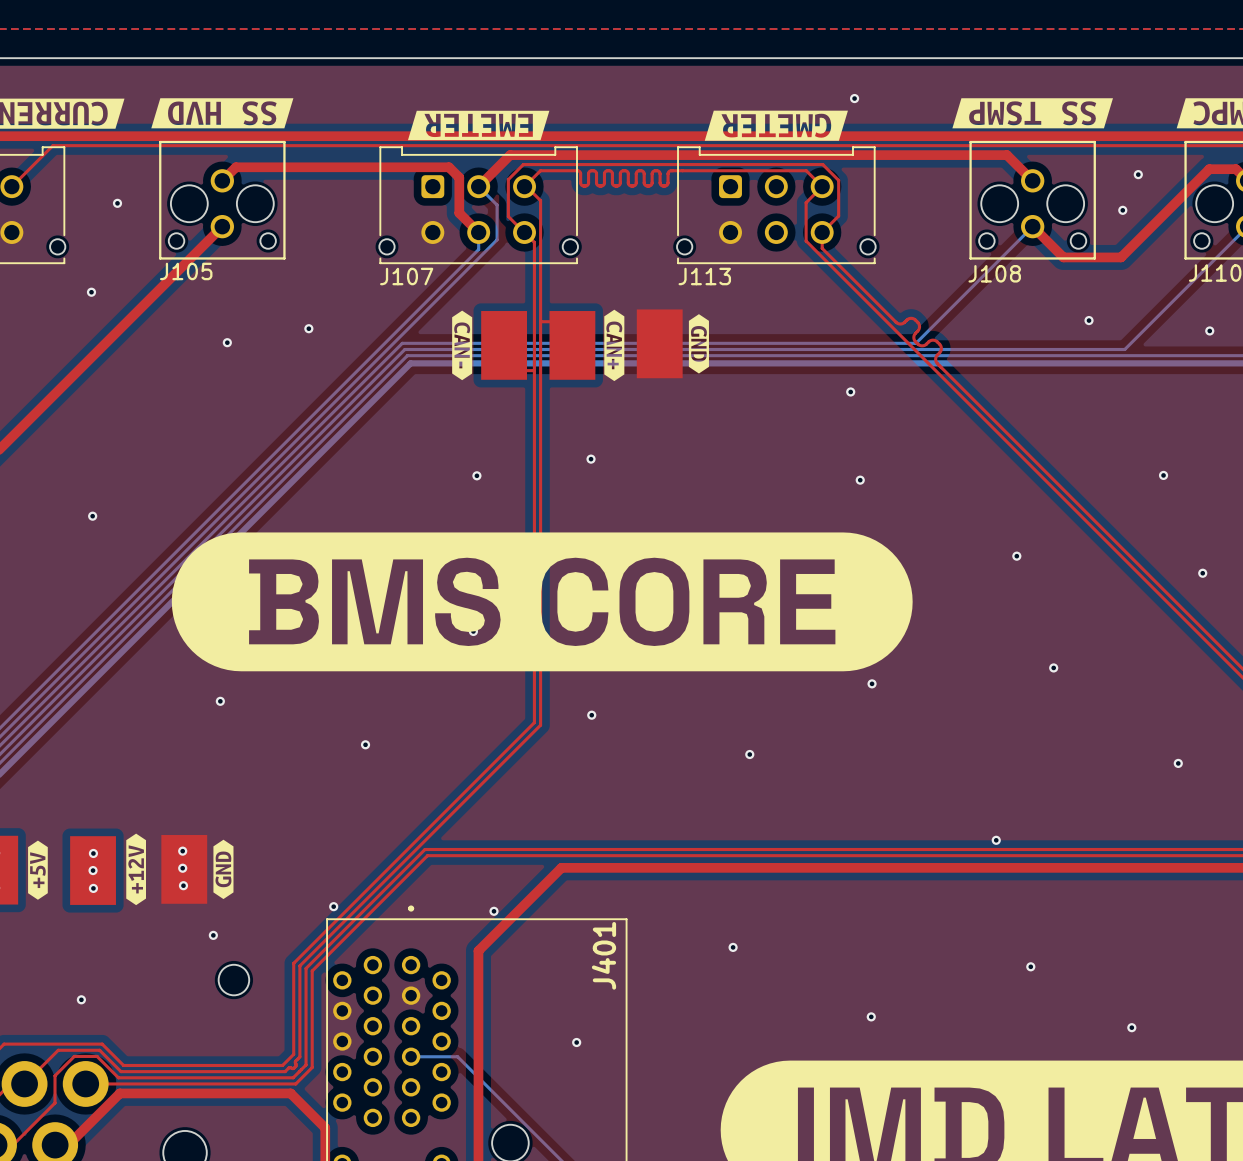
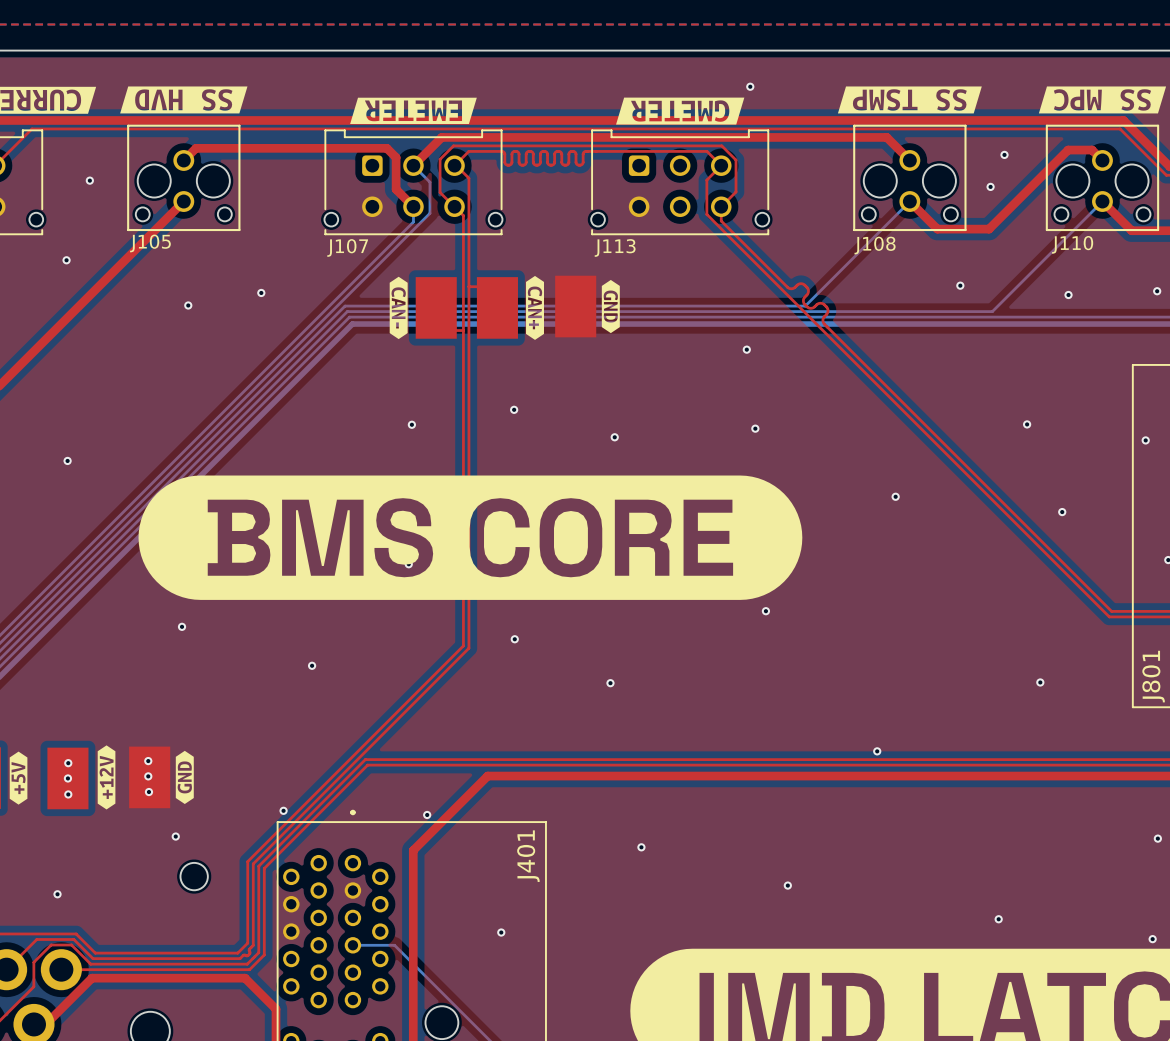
via: none -> (614, 437)
via: (1053, 667) -> none
via position: (749, 754) -> (610, 683)
via: (1030, 966) -> none
via position: (871, 1016) -> (787, 885)

